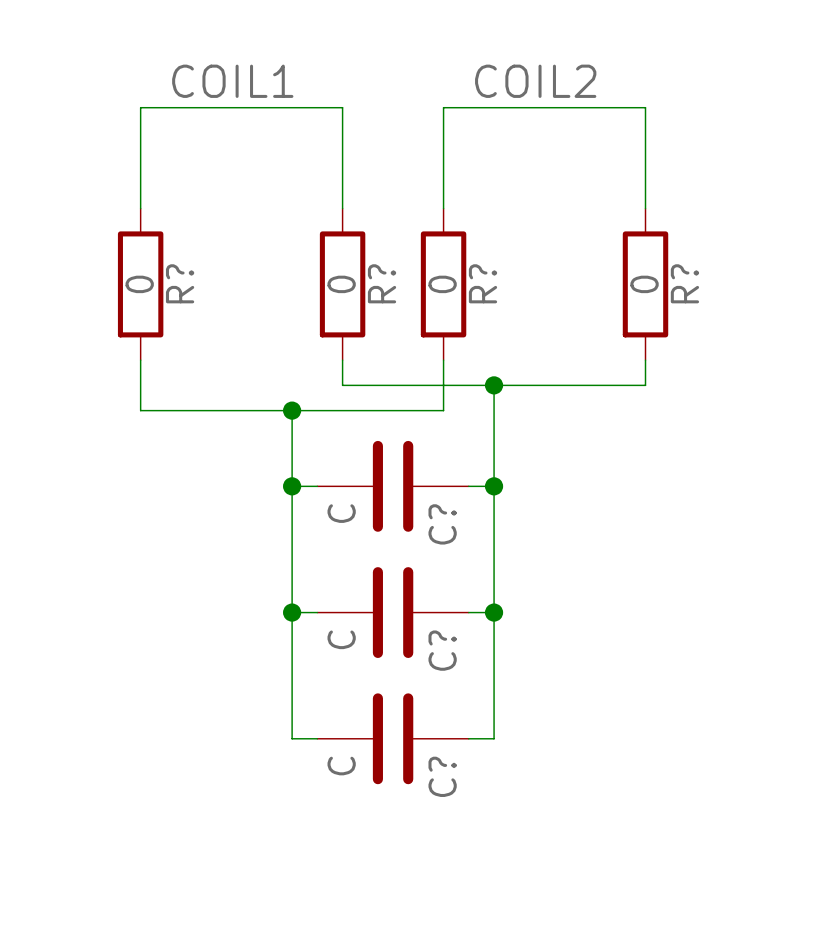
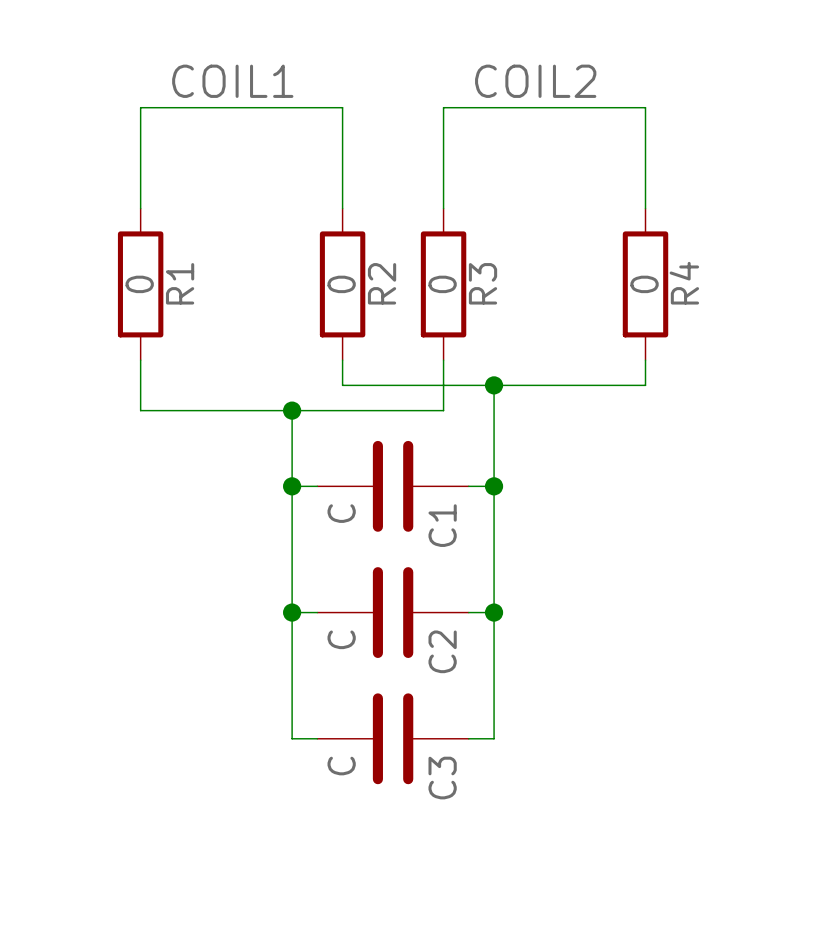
R? name: R? (180, 283) -> R1 (180, 283)
R? name: R? (382, 283) -> R2 (382, 283)
R? name: R? (483, 283) -> R3 (483, 283)
R? name: R? (684, 283) -> R4 (684, 283)
C? name: C? (442, 524) -> C1 (442, 525)
C? name: C? (442, 650) -> C2 (442, 651)
C? name: C? (442, 776) -> C3 (442, 778)

